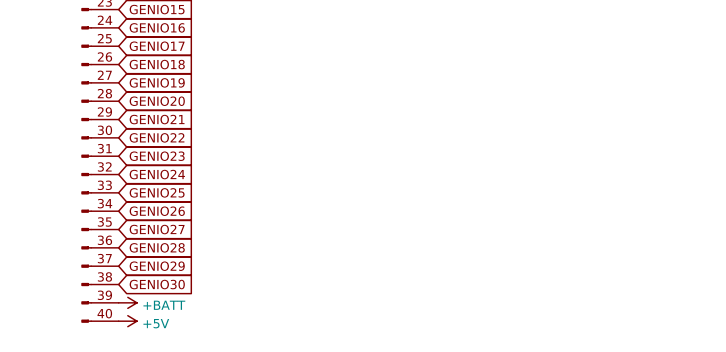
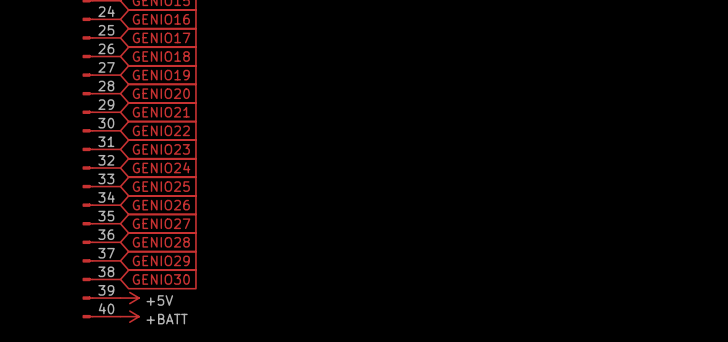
power symbol: +BATT (127, 302) -> +5V (129, 298)
power symbol: +5V (127, 321) -> +BATT (129, 316)

